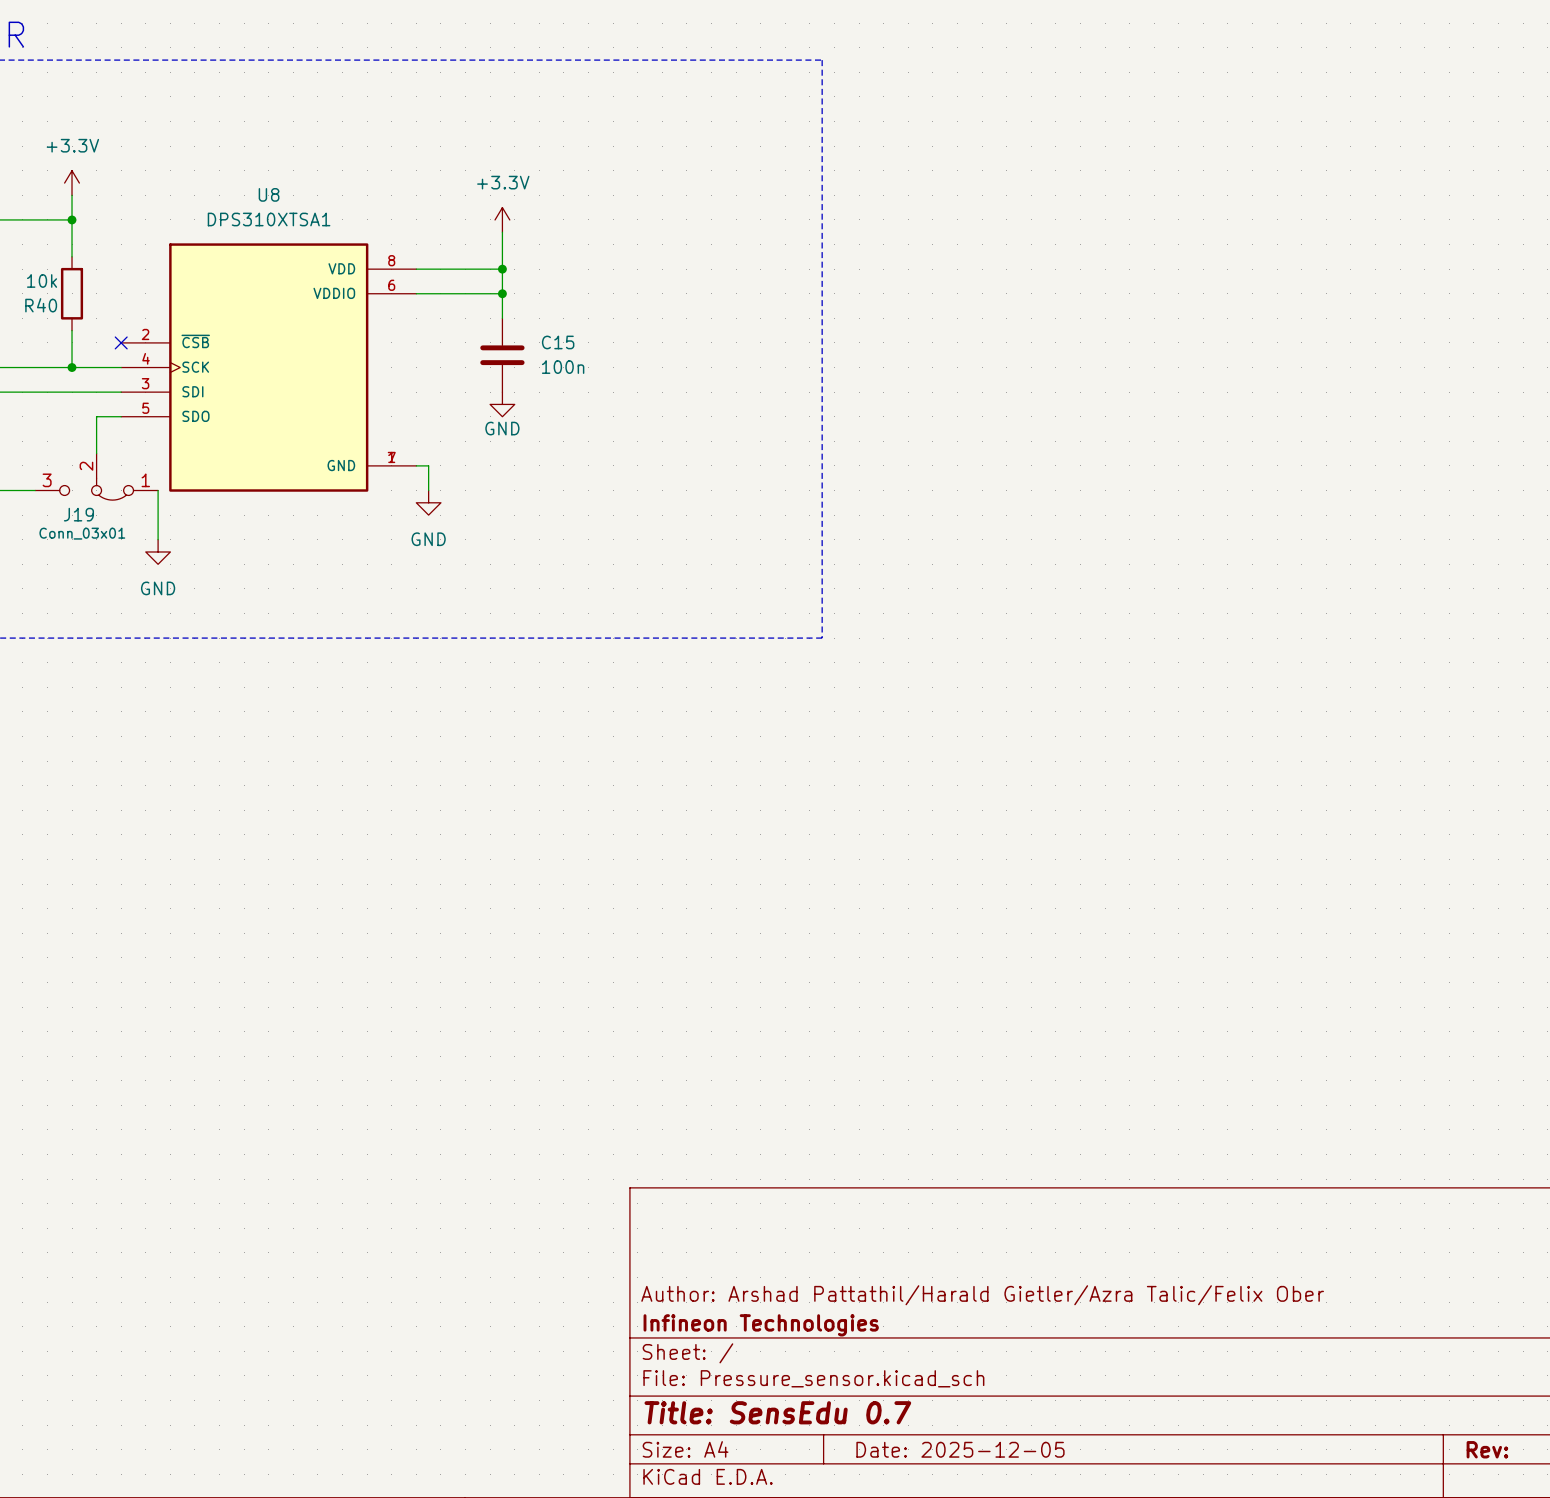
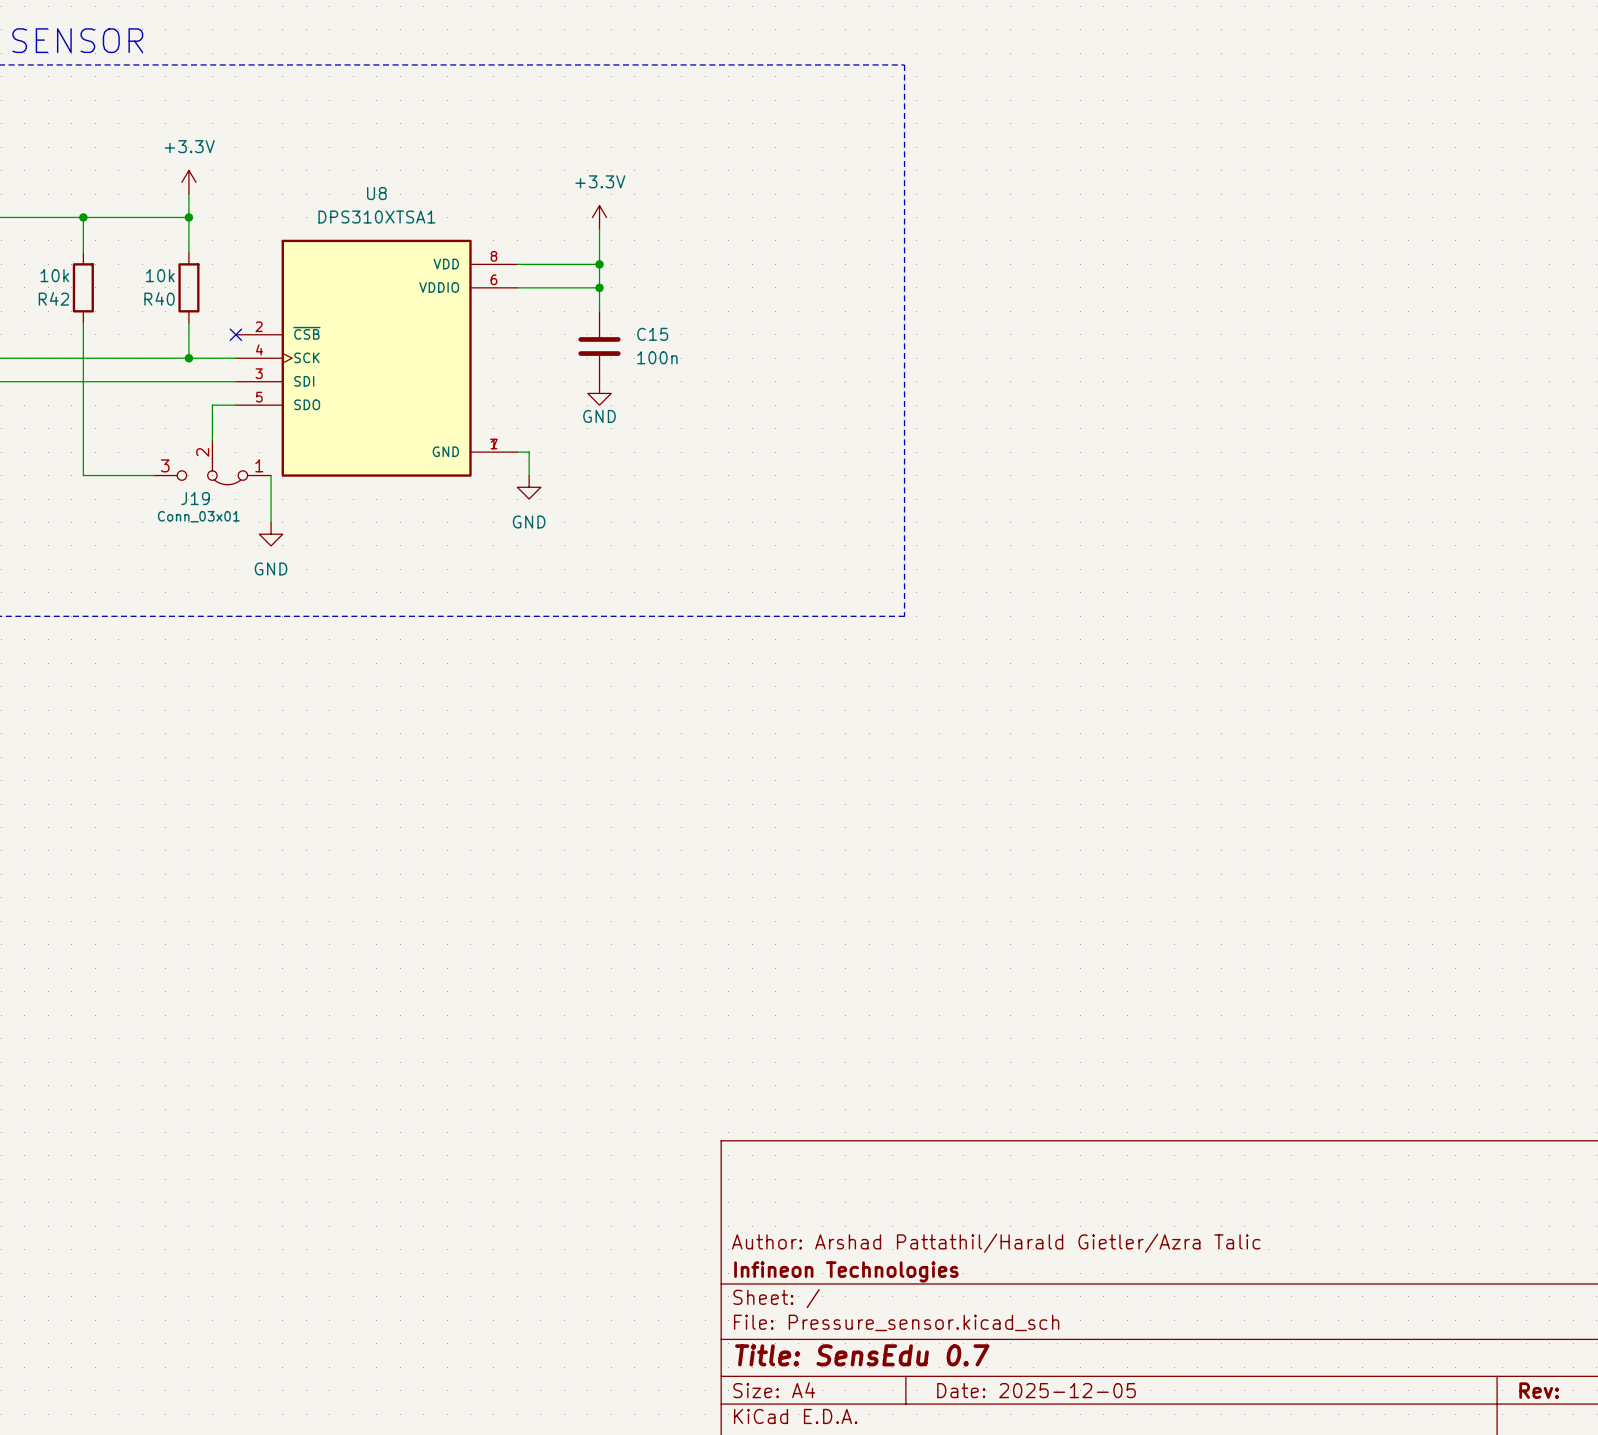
title block: Author: Arshad Pattathil/Harald Gietler/Azra Talic/Felix Ober (982, 1295) -> Author: Arshad Pattathil/Harald Gietler/Azra Talic (996, 1243)

